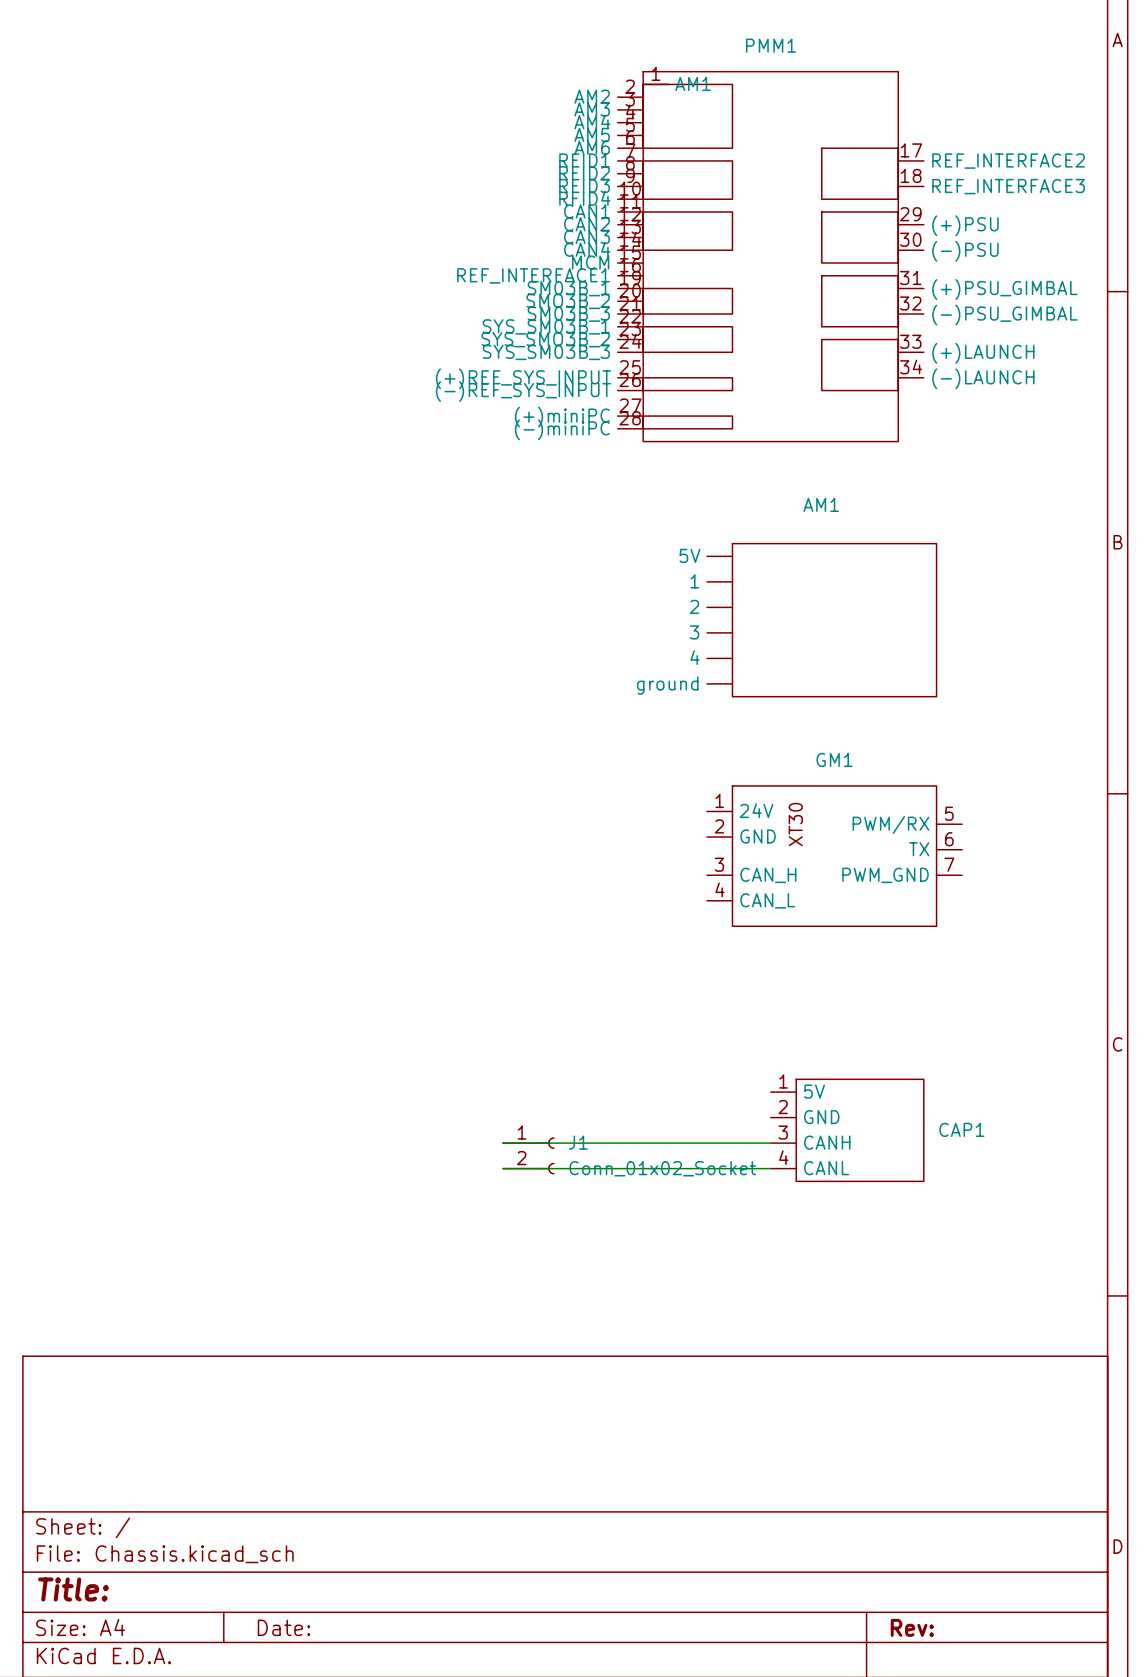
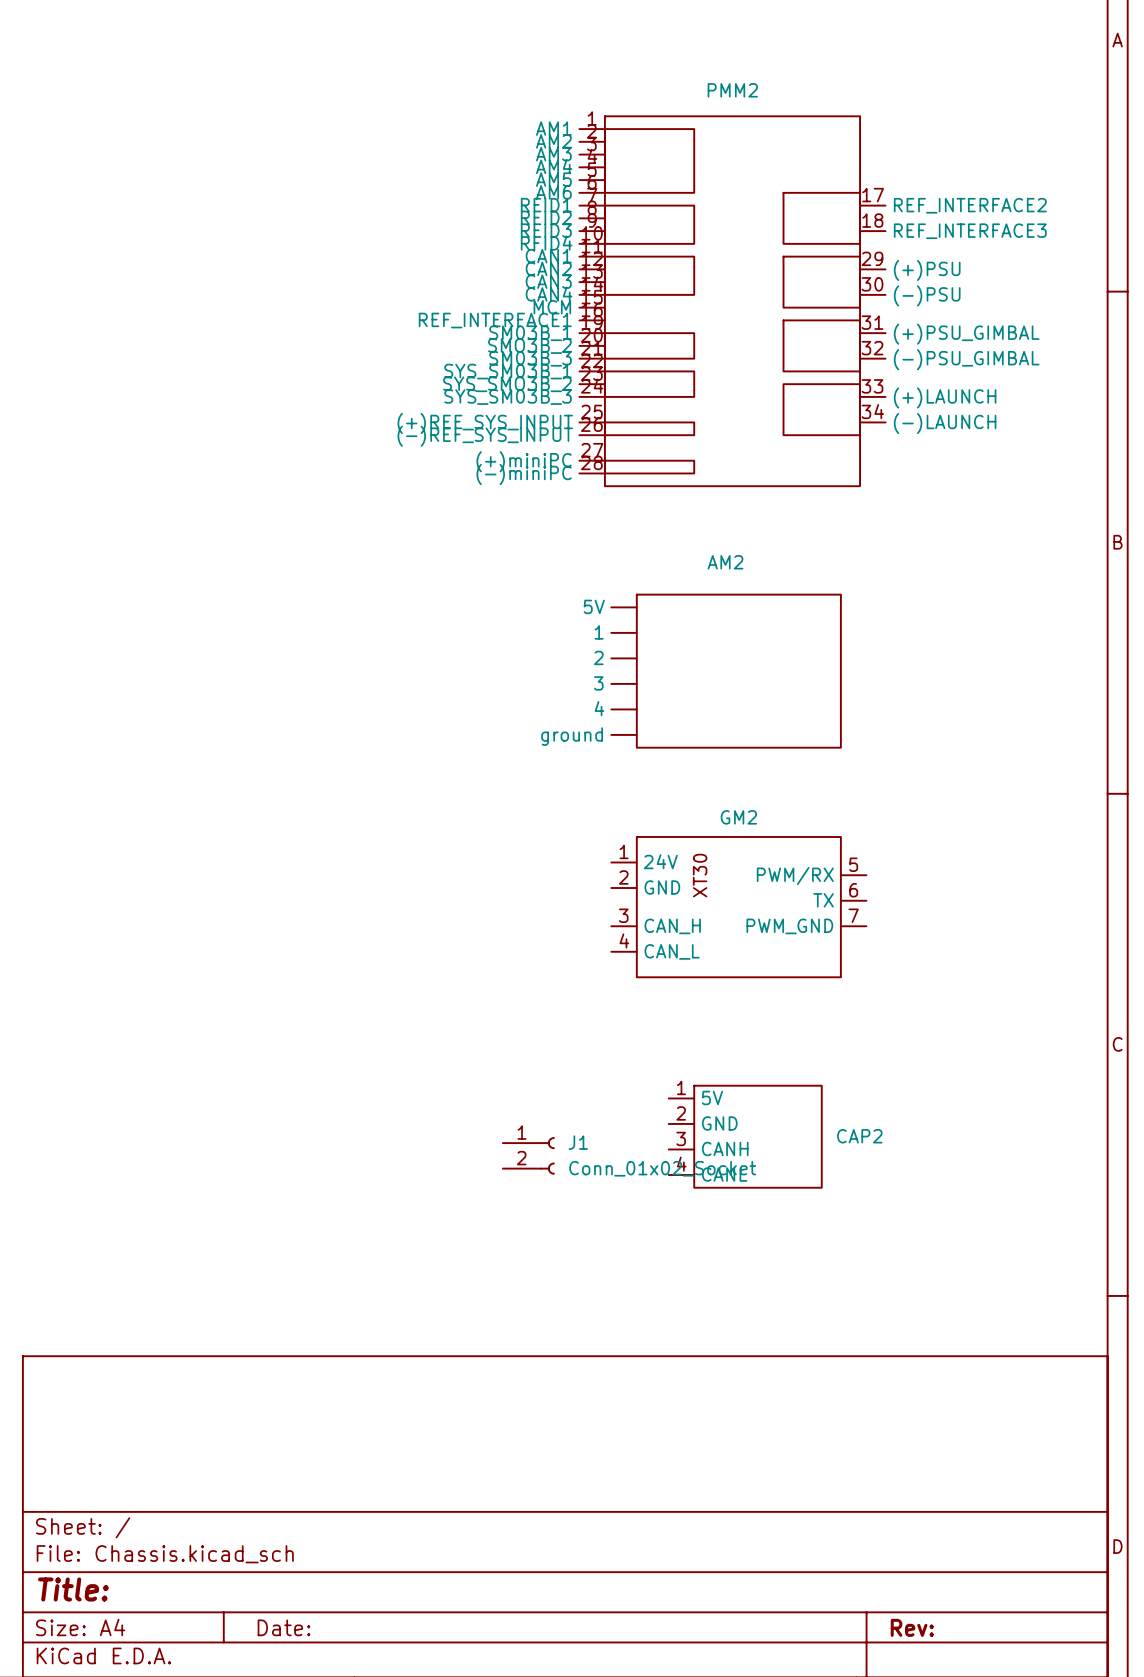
PMM1: (770, 256) -> none
PMM2: none -> (732, 301)
AM1: (821, 613) -> none
AM2: none -> (726, 664)
GM1: (834, 856) -> none
GM2: none -> (738, 907)
CAP1: (847, 1130) -> none
CAP2: none -> (745, 1136)
wire: (502, 1143) (770, 1143) -> none
wire: (502, 1168) (770, 1168) -> none

